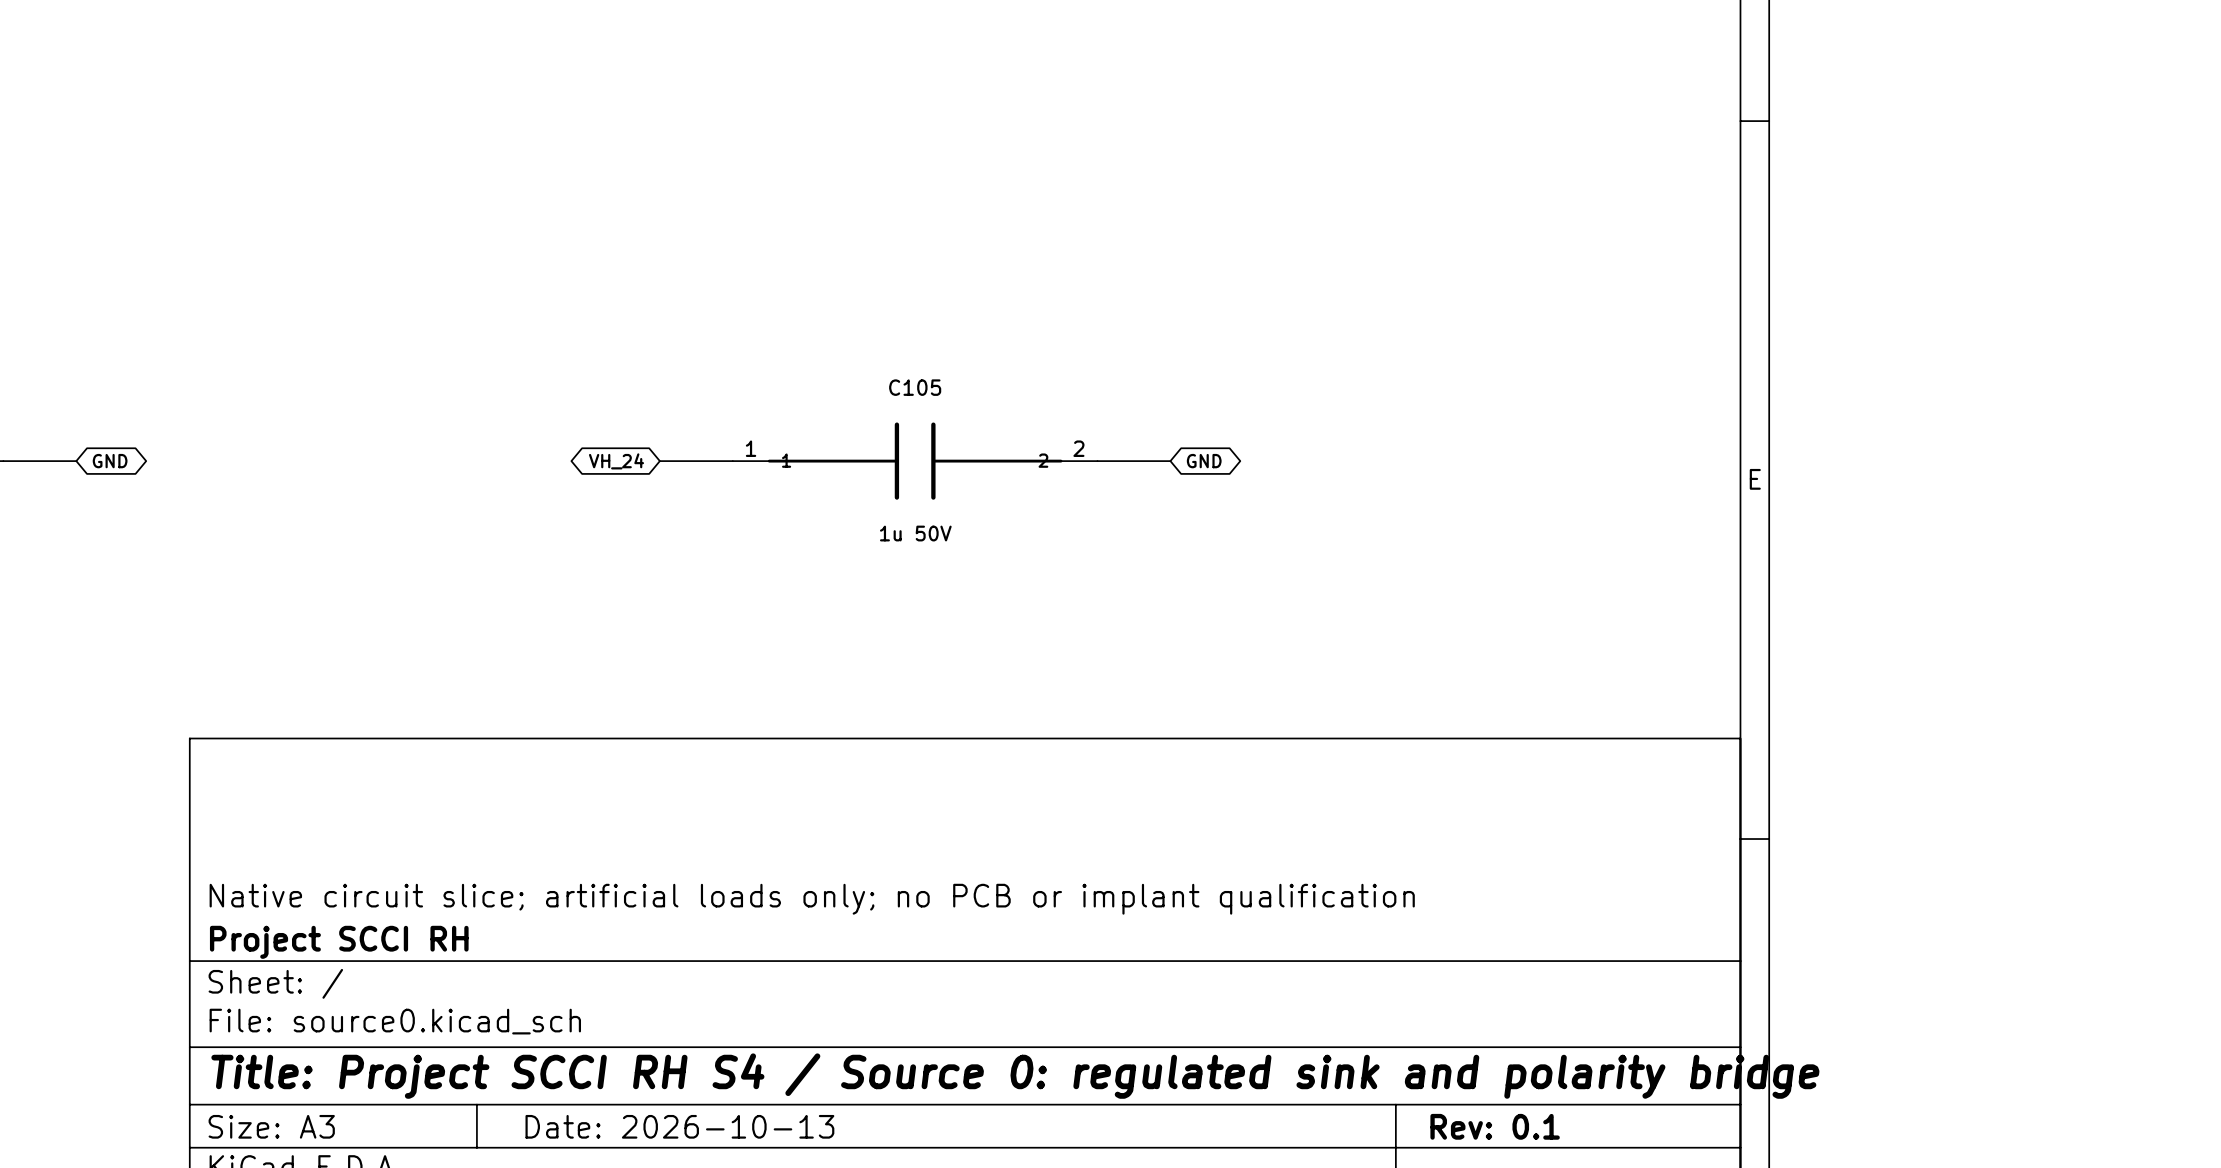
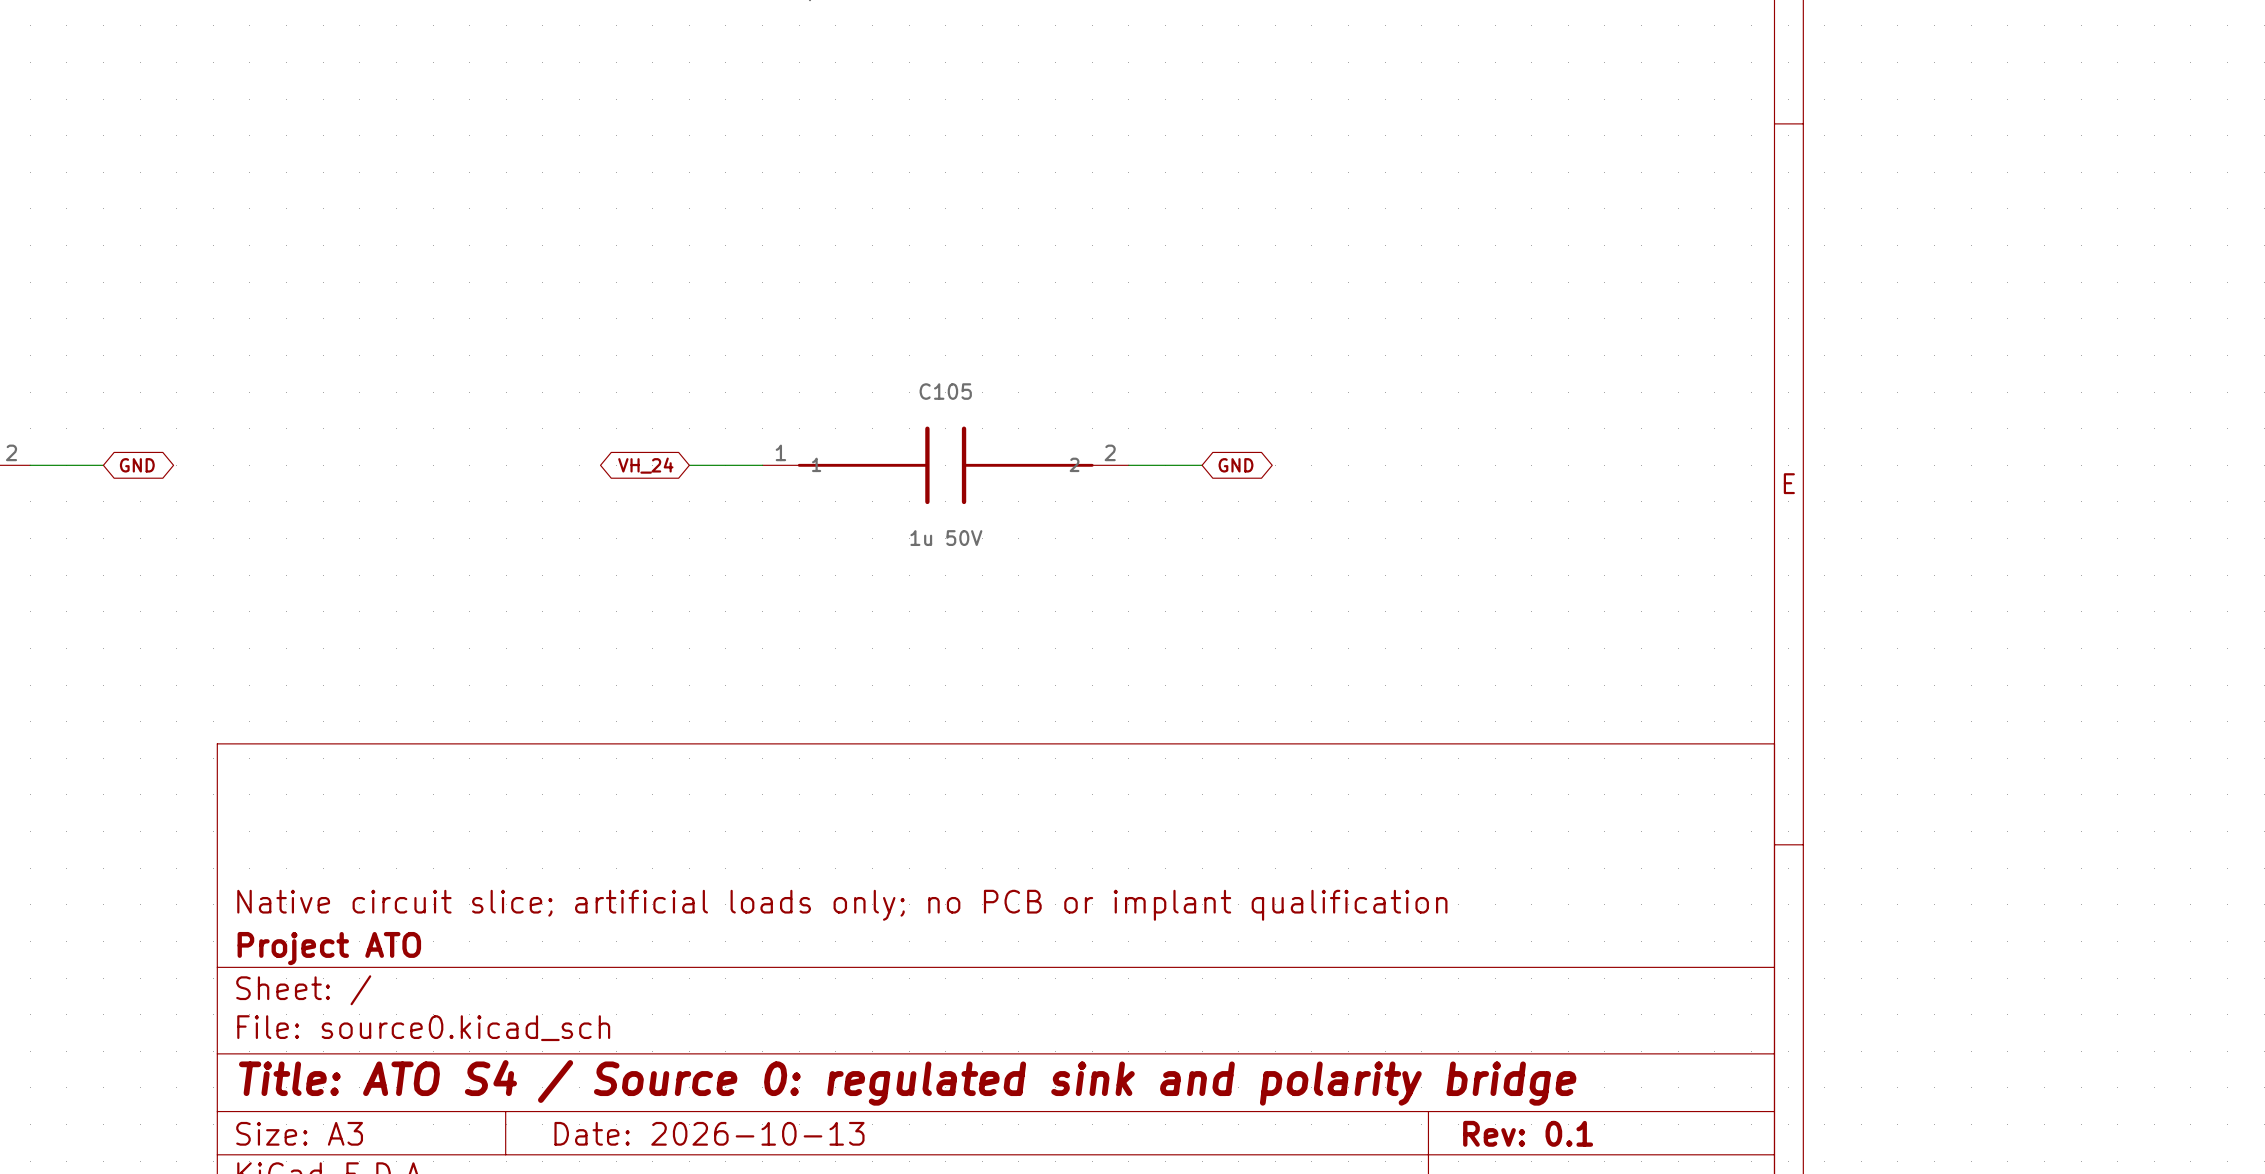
title block: Project SCCI RH (339, 942) -> Project ATO (329, 948)
title block: Title: Project SCCI RH S4 / Source 0: regulated sink and polarity bridge (1015, 1076) -> Title: ATO S4 / Source 0: regulated sink and polarity bridge (907, 1082)

